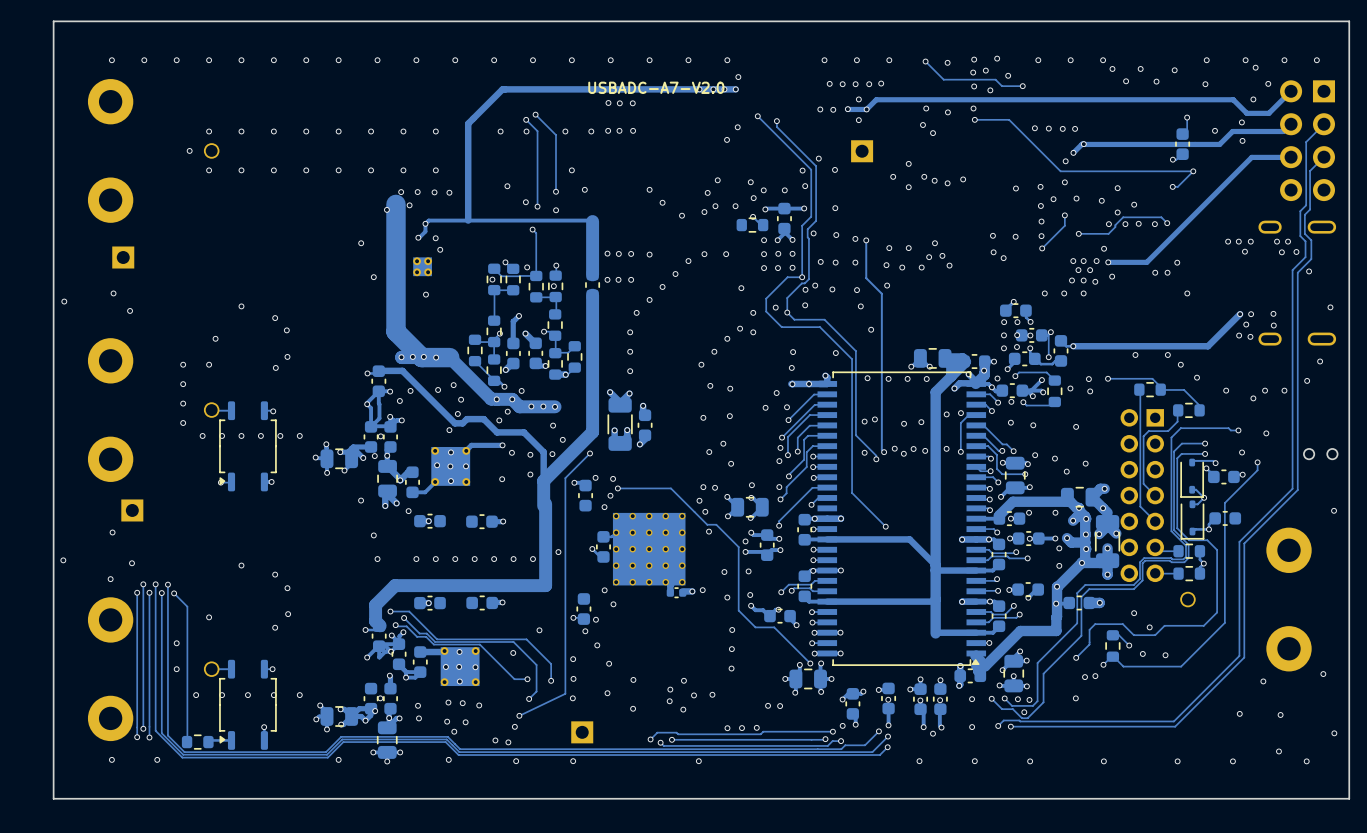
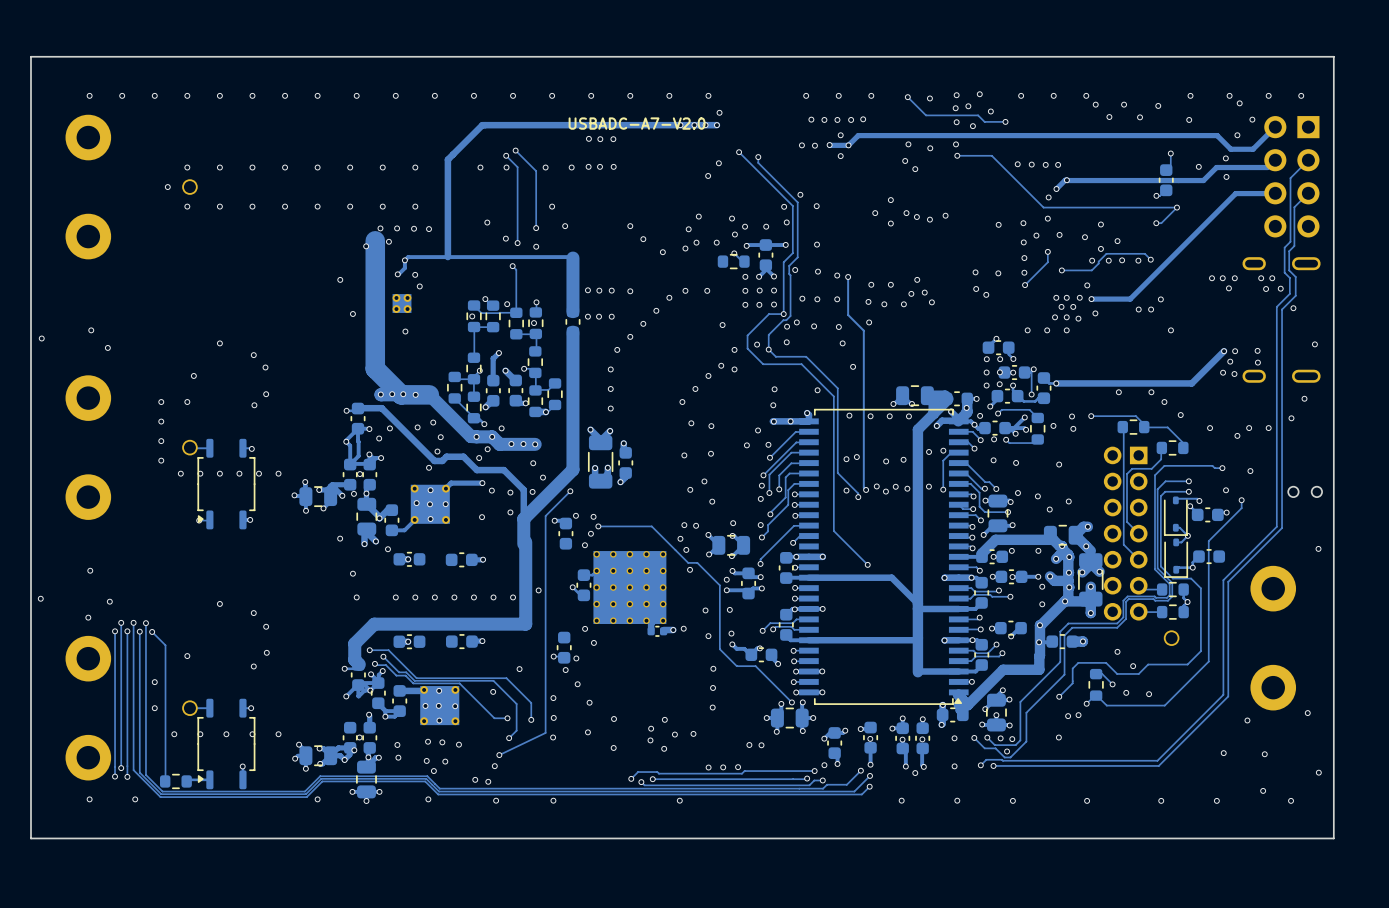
part: (862, 151) -> none
part: (123, 257) -> none
part: (132, 510) -> none
part: (582, 732) -> none

